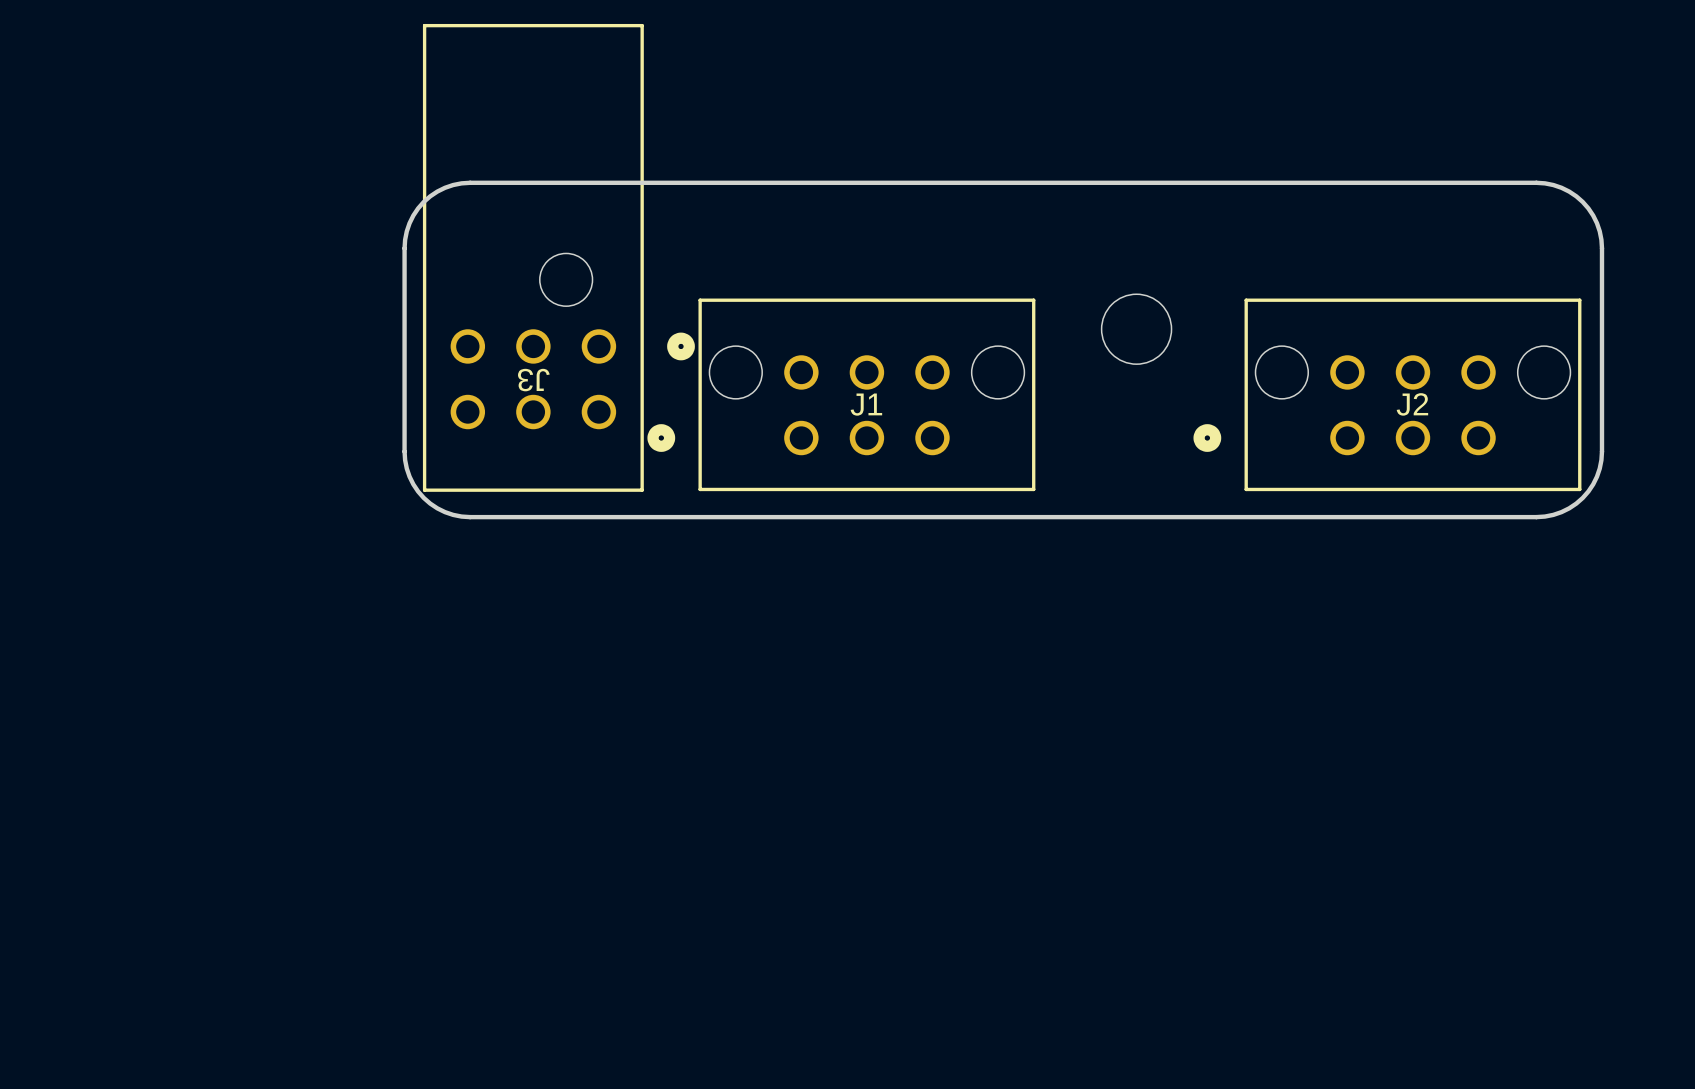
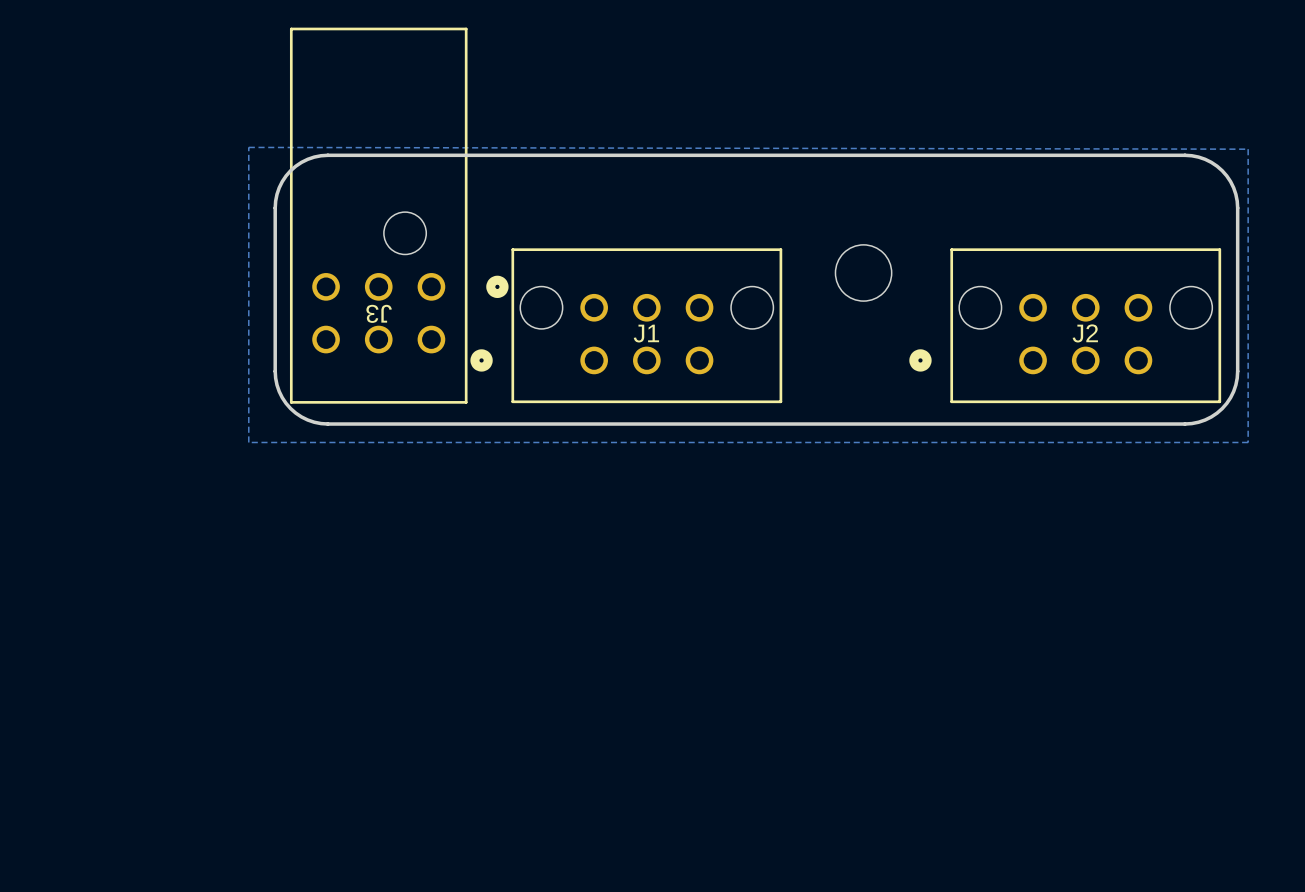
zone outline: none -> (248, 147) (248, 442) (1248, 442) (1248, 149) (248, 147)

